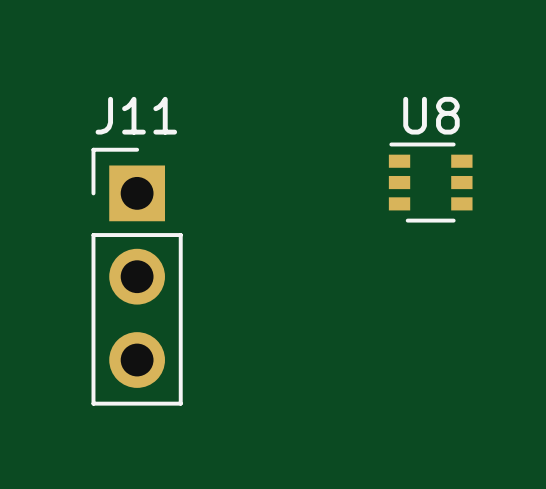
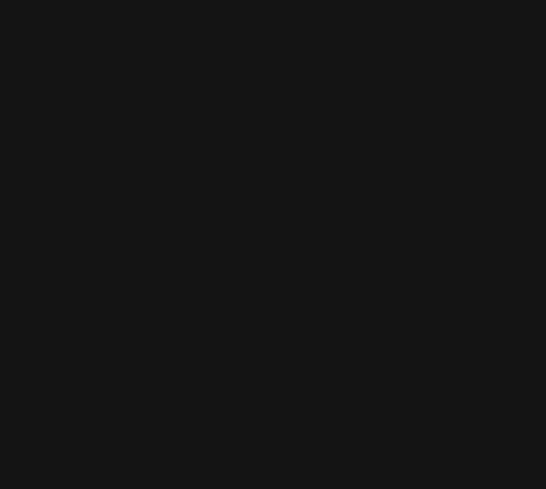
U8: (430, 182) -> none
J11: (137, 276) -> none

